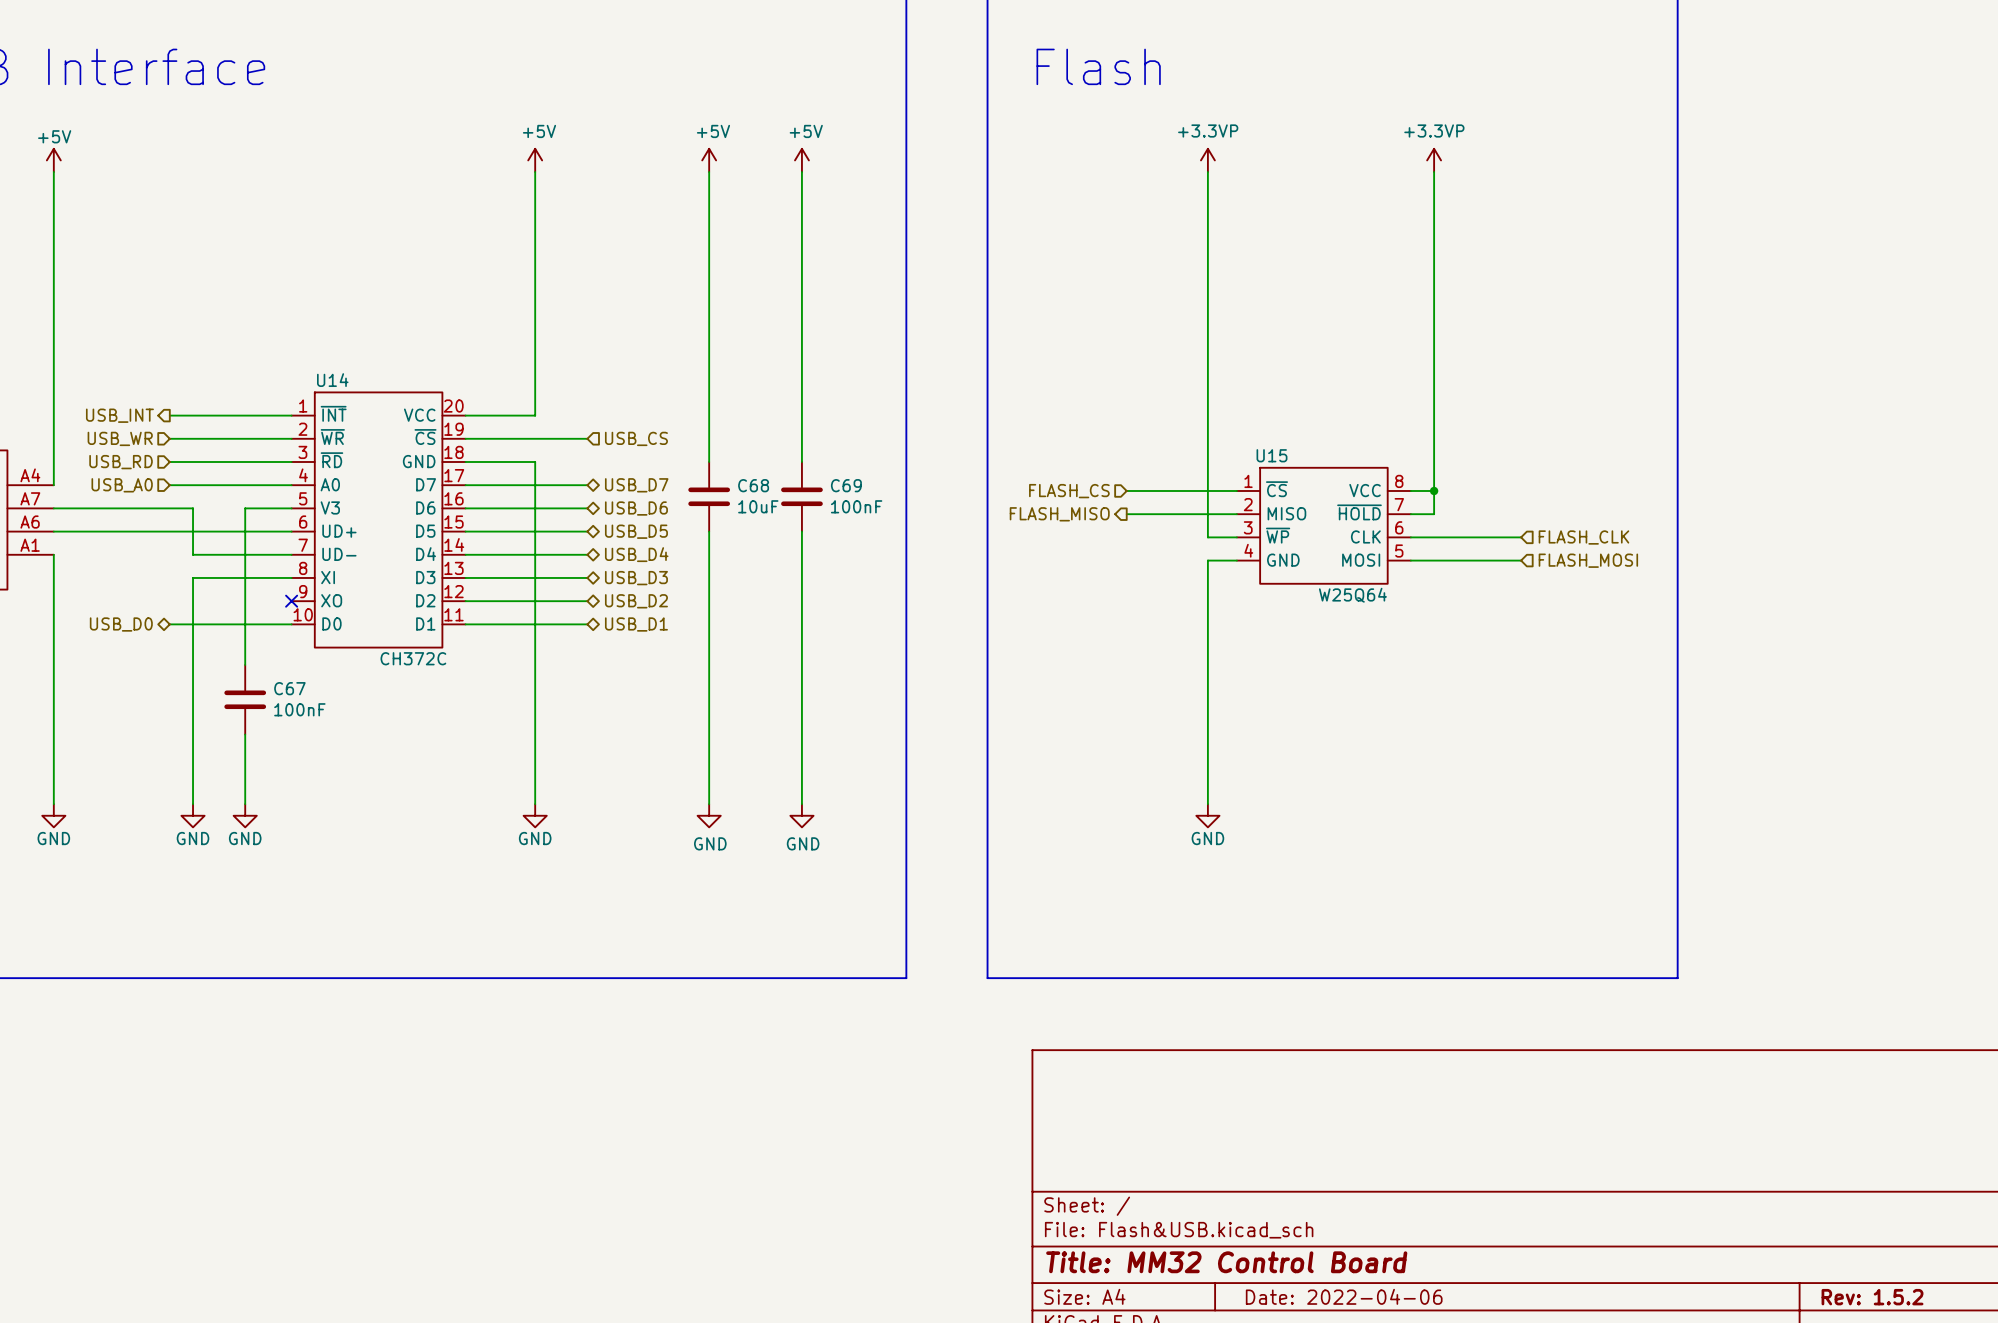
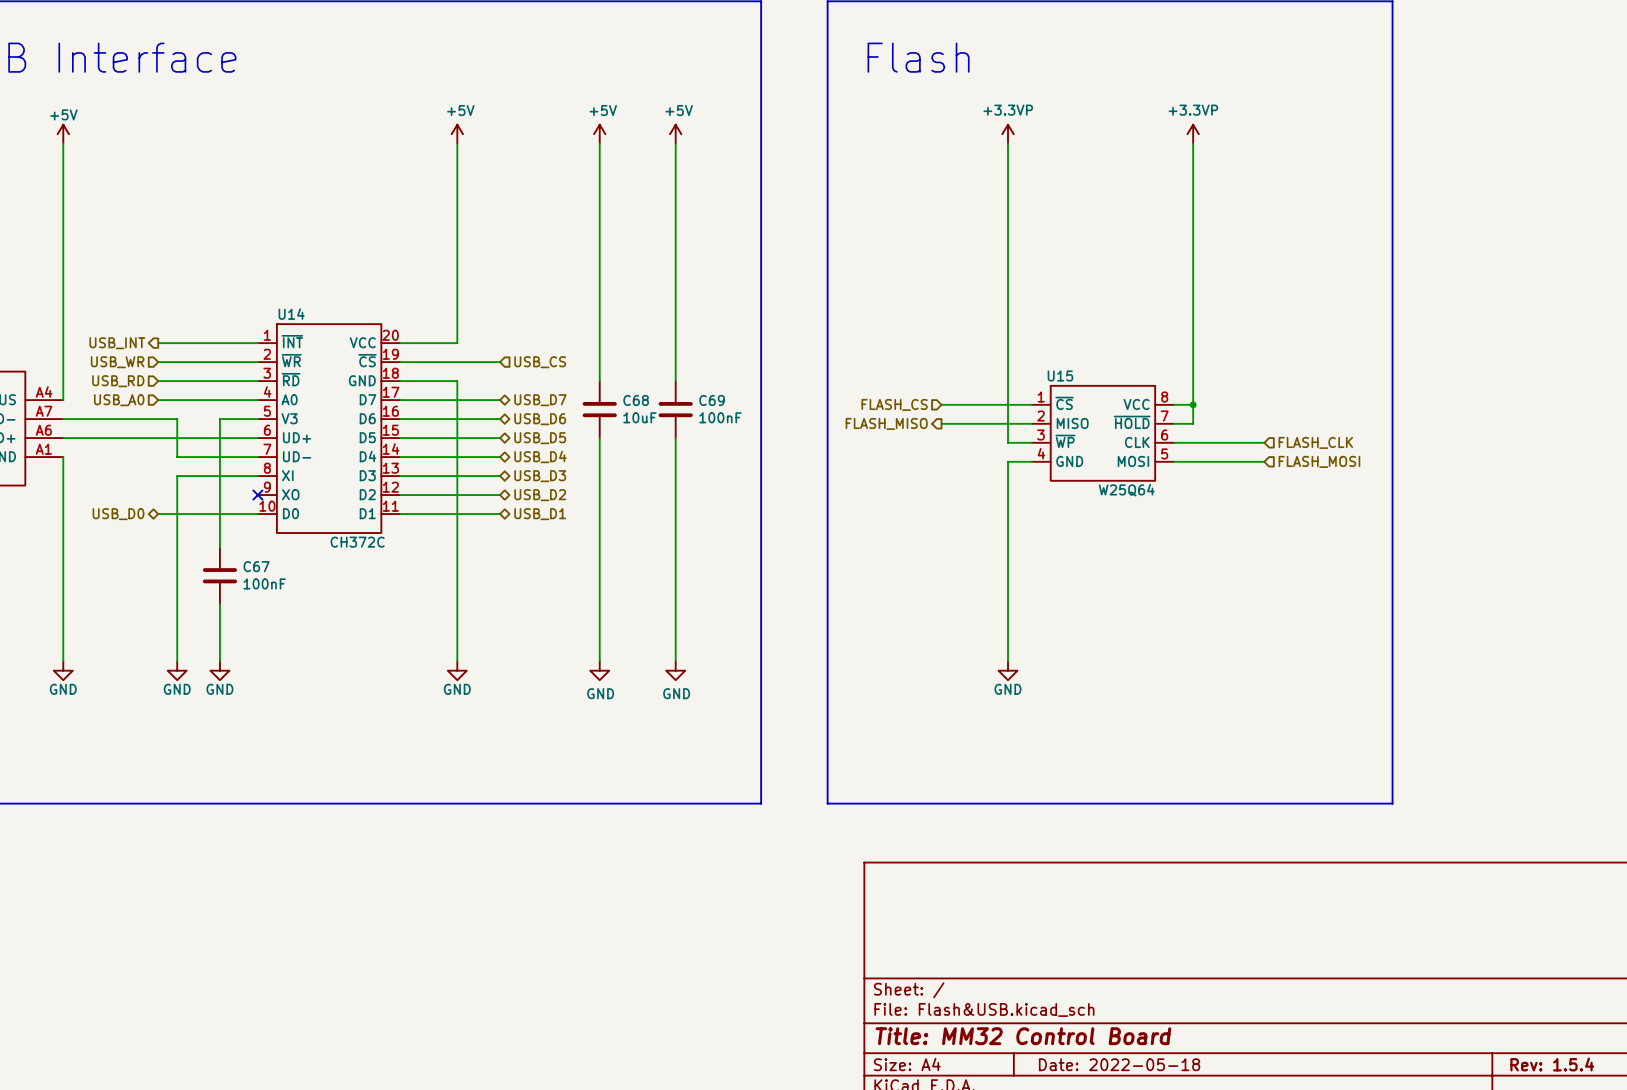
title block: Date: 2022-04-06 (1344, 1296) -> Date: 2022-05-18 (1119, 1064)
title block: Rev: 1.5.2 (1872, 1297) -> Rev: 1.5.4 (1552, 1064)

